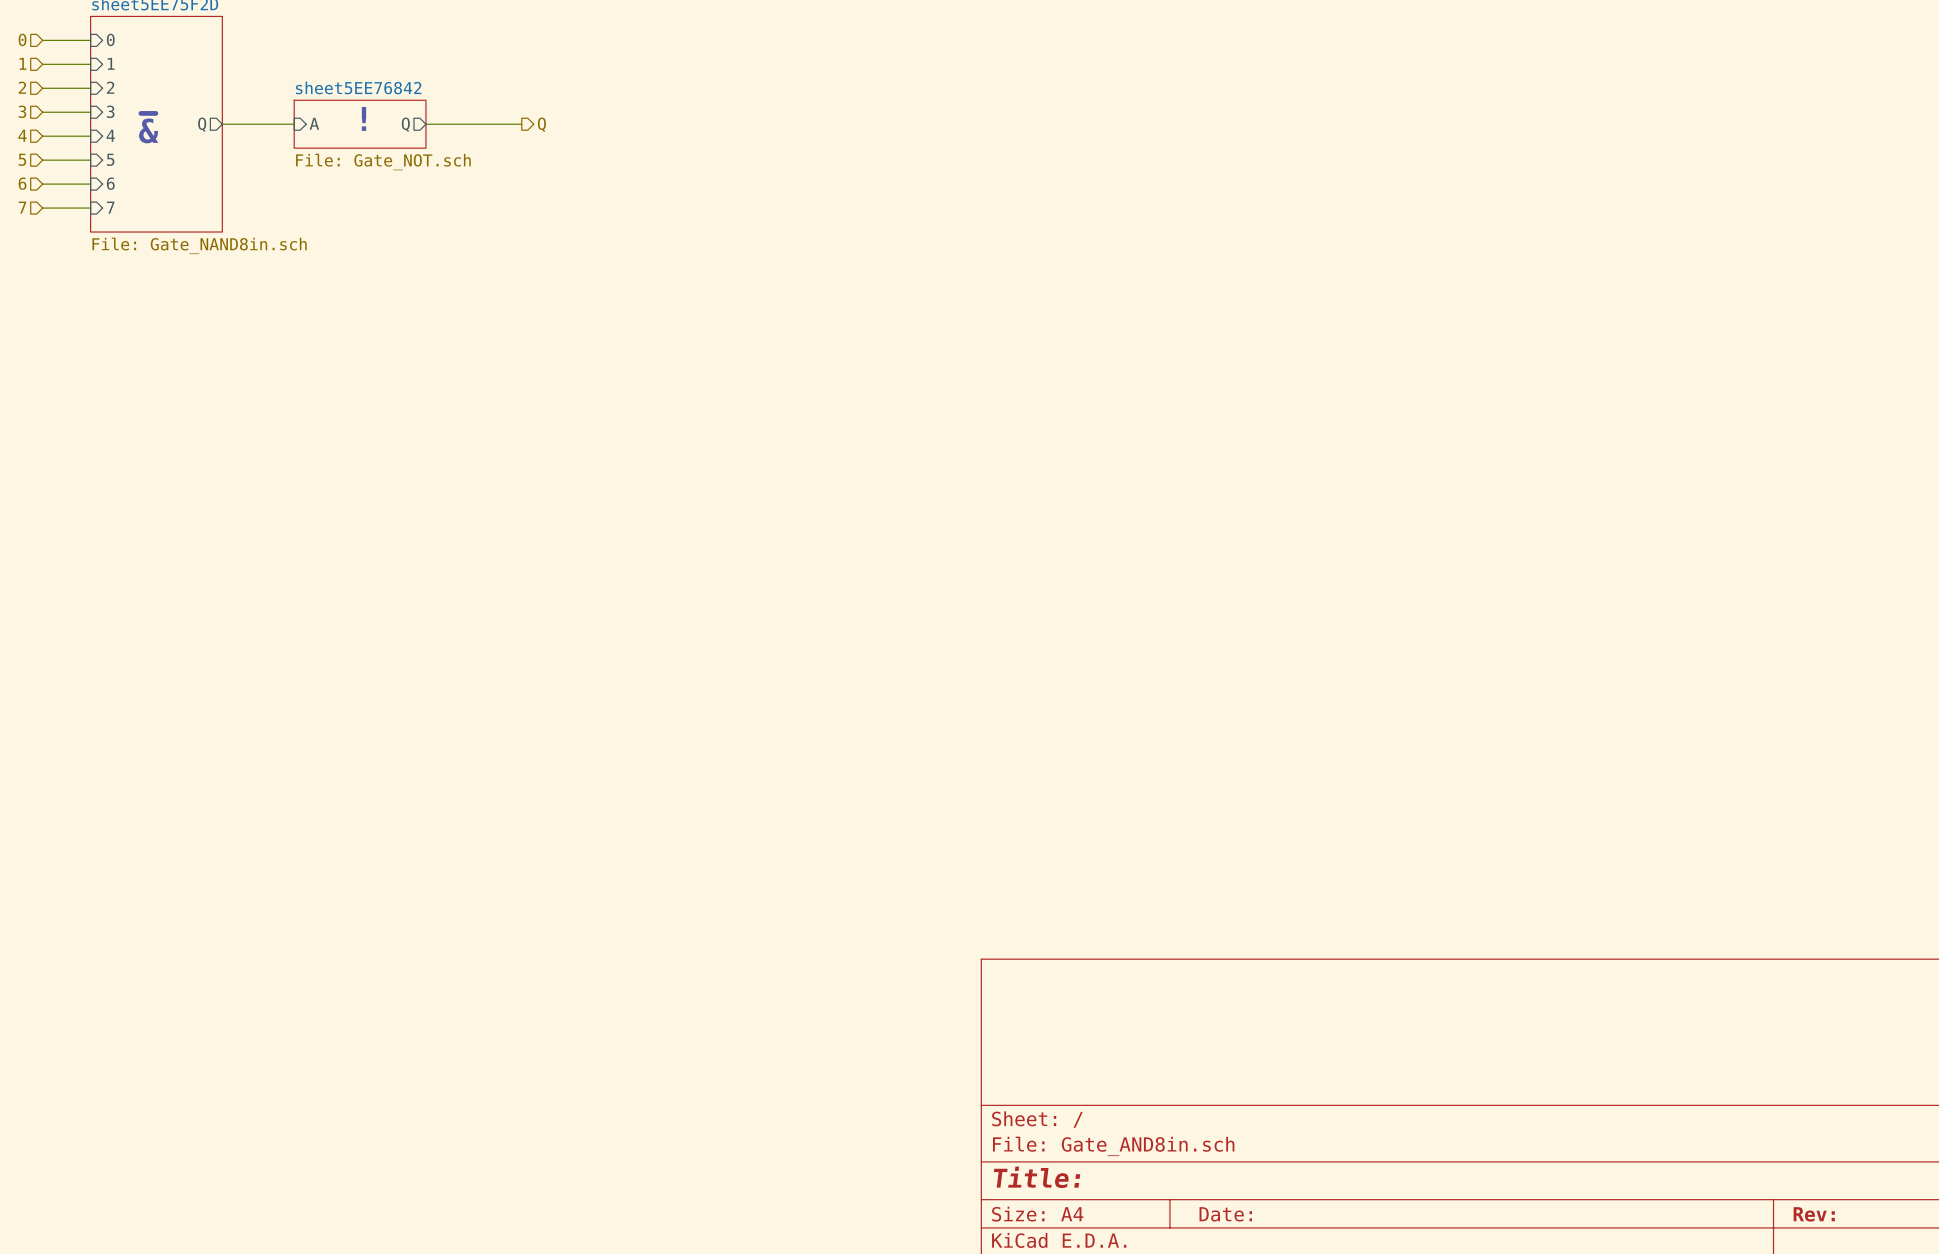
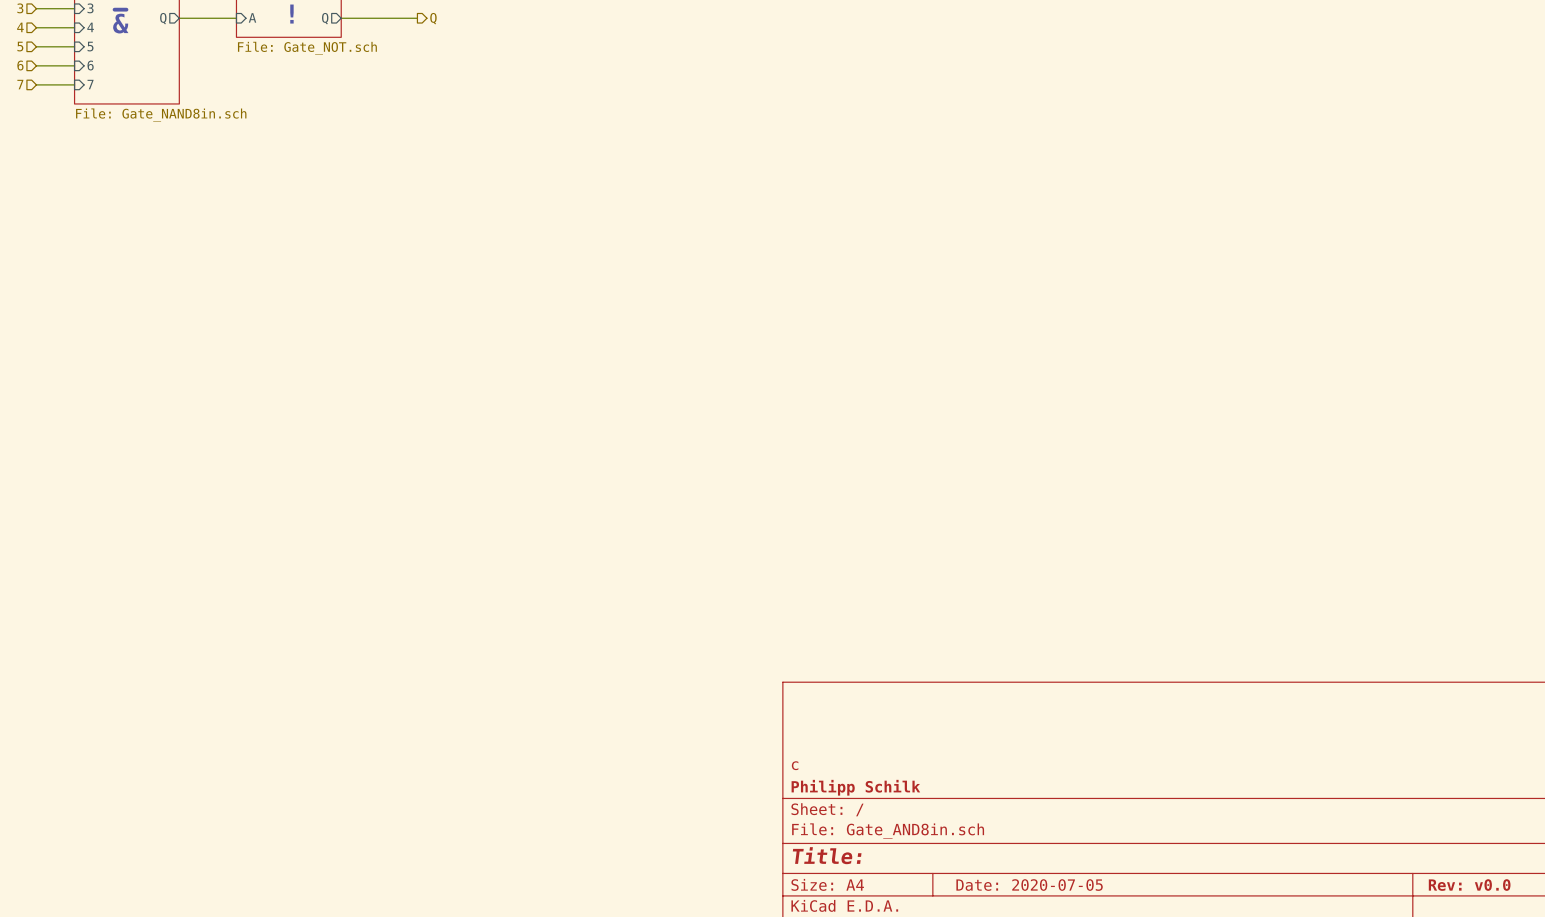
title block: none -> c (795, 765)
title block: none -> Philipp Schilk (855, 787)
title block: Date: (1225, 1214) -> Date: 2020-07-05 (1029, 885)
title block: Rev: (1814, 1214) -> Rev: v0.0 (1469, 885)

